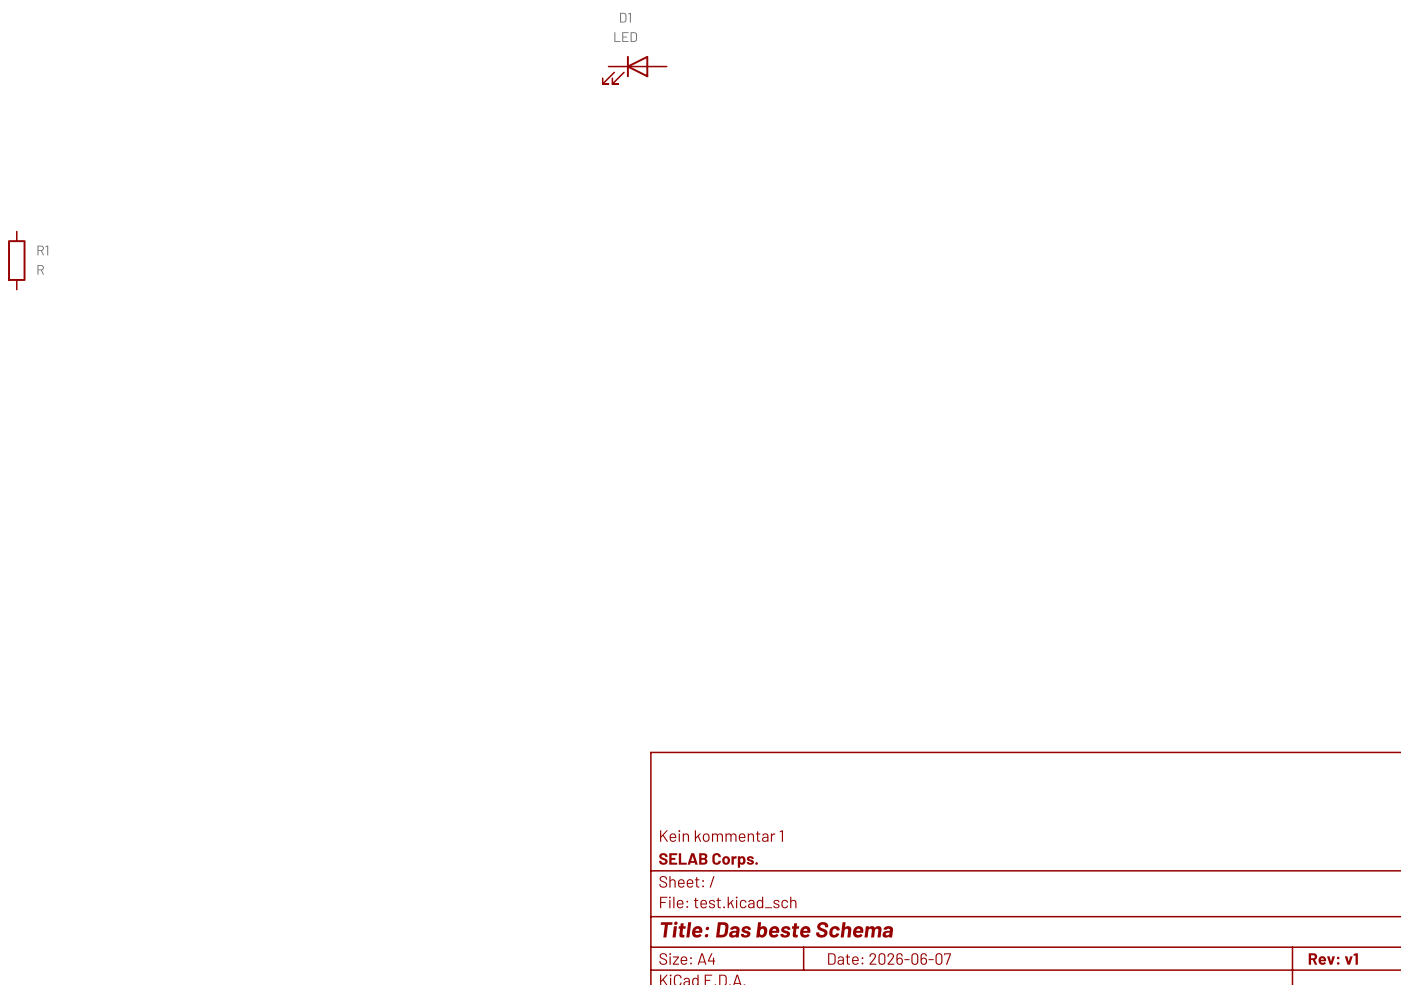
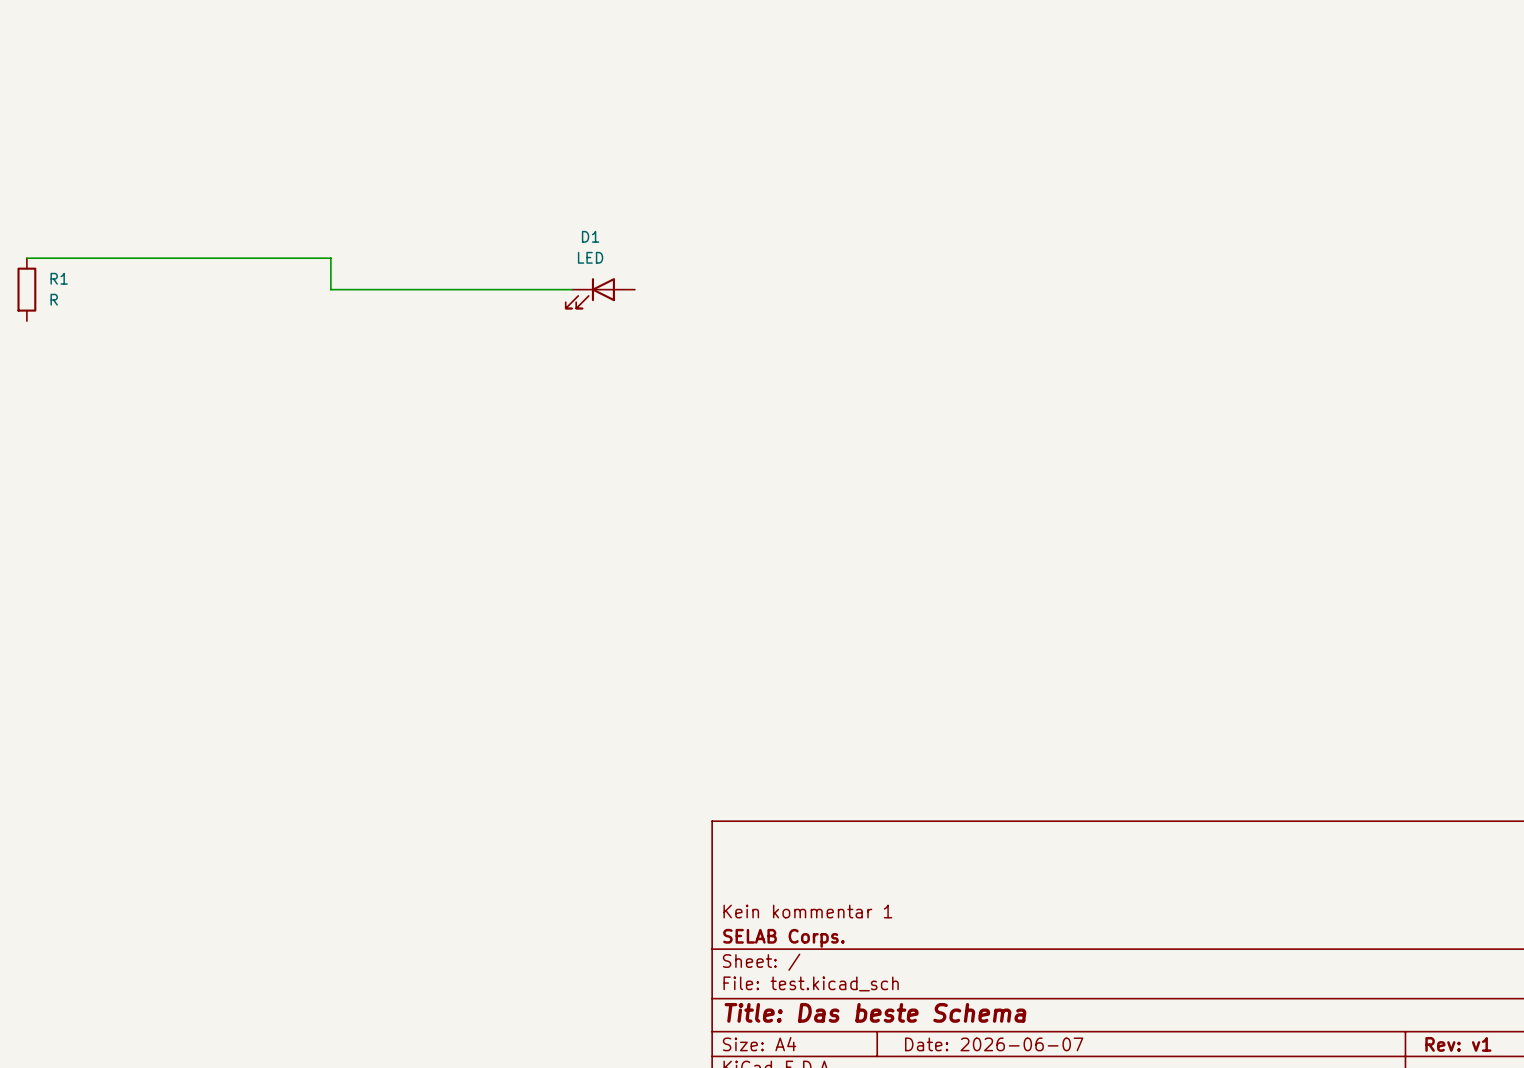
D1 position: (634, 69) -> (600, 293)
wire: none -> (26, 258) (330, 258) (330, 289) (571, 289)

